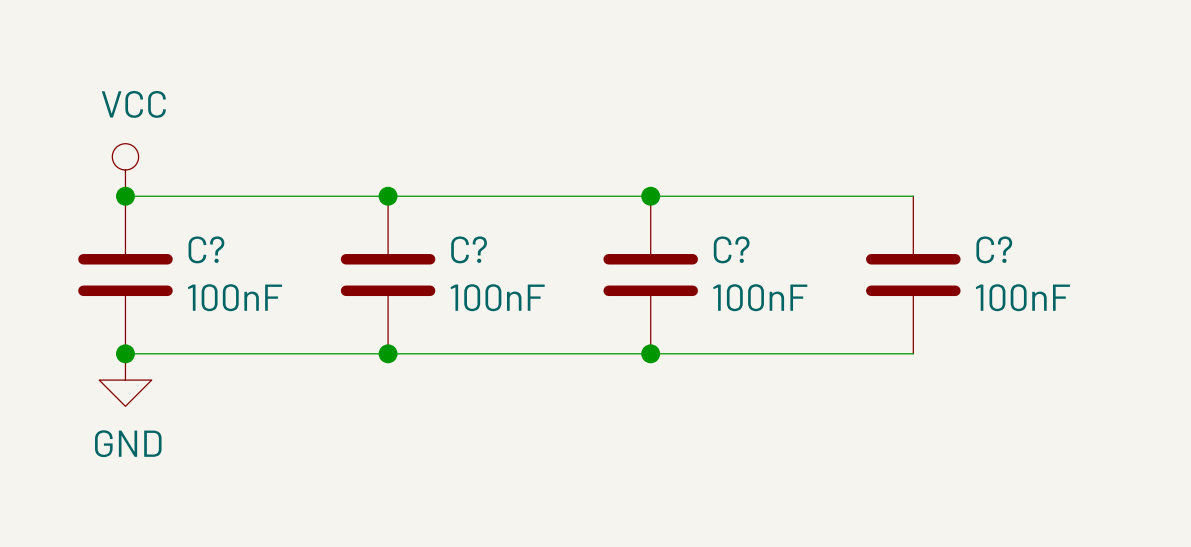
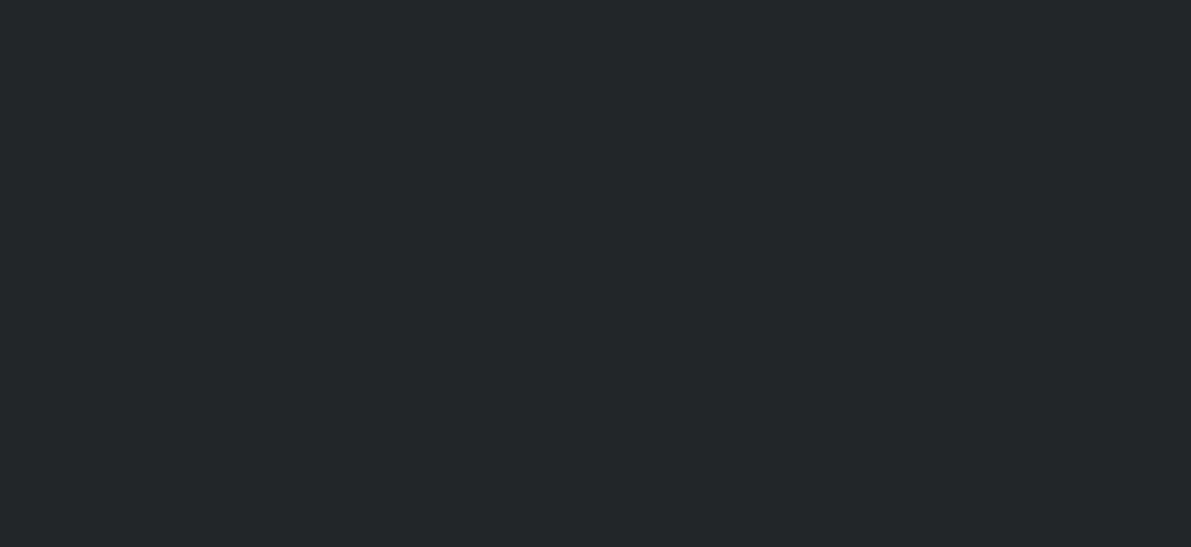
power symbol: VCC (125, 169) -> none
wire: (125, 196) (913, 196) -> none
junction: (125, 196) -> none
junction: (388, 196) -> none
junction: (650, 196) -> none
C?: 100nF (125, 275) -> none
C?: 100nF (388, 275) -> none
C?: 100nF (650, 275) -> none
C?: 100nF (913, 275) -> none
wire: (125, 353) (913, 353) -> none
junction: (125, 353) -> none
junction: (388, 353) -> none
junction: (650, 353) -> none
power symbol: GND (125, 380) -> none

